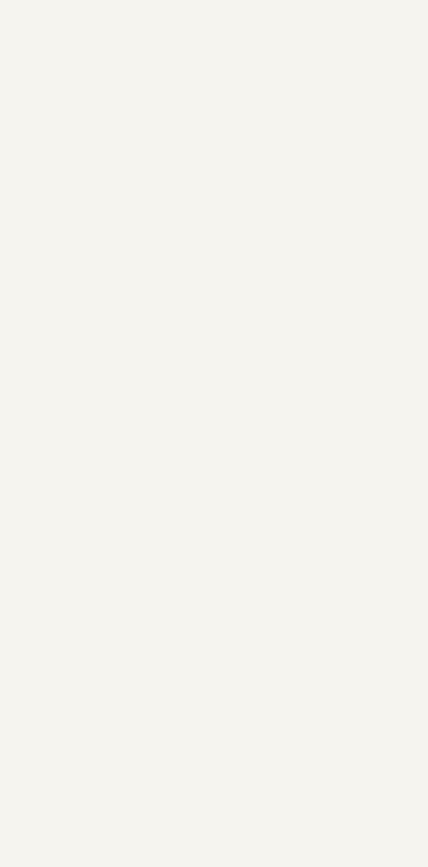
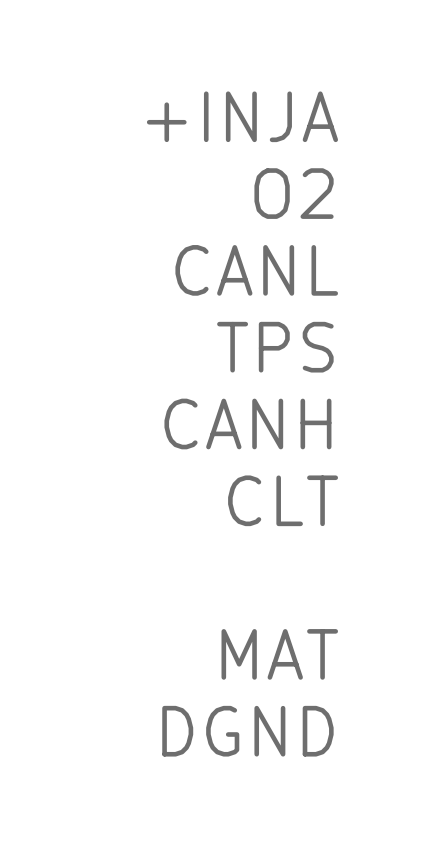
label: none -> +INJA (242, 116)
label: none -> O2 (294, 193)
label: none -> CANL (256, 270)
label: none -> TPS (275, 347)
label: none -> CANH (247, 423)
label: none -> CLT (283, 500)
label: none -> MAT (279, 654)
label: none -> DGND (247, 731)

